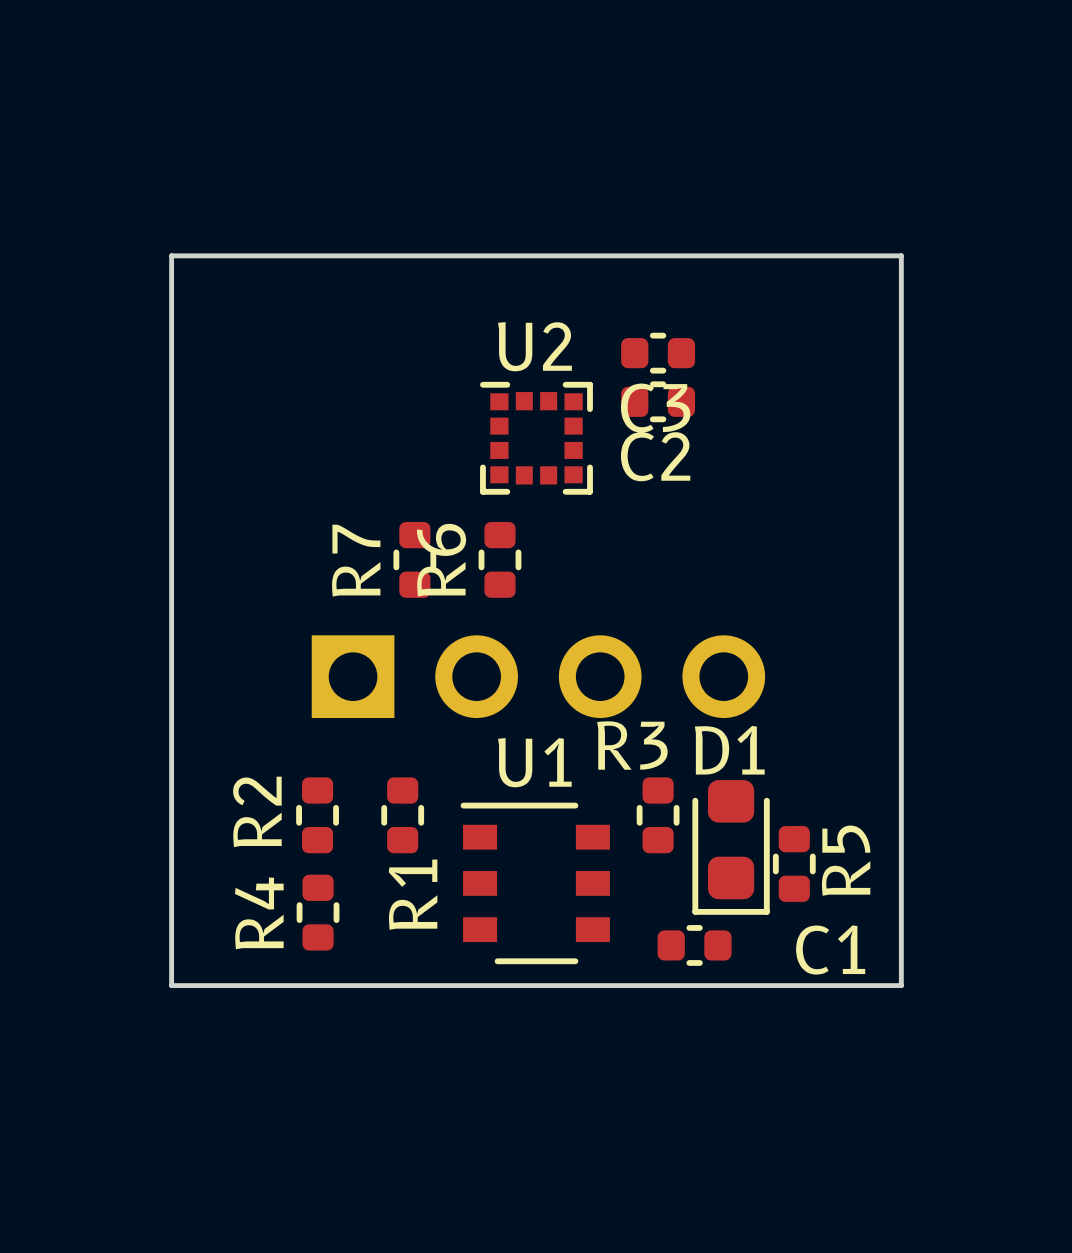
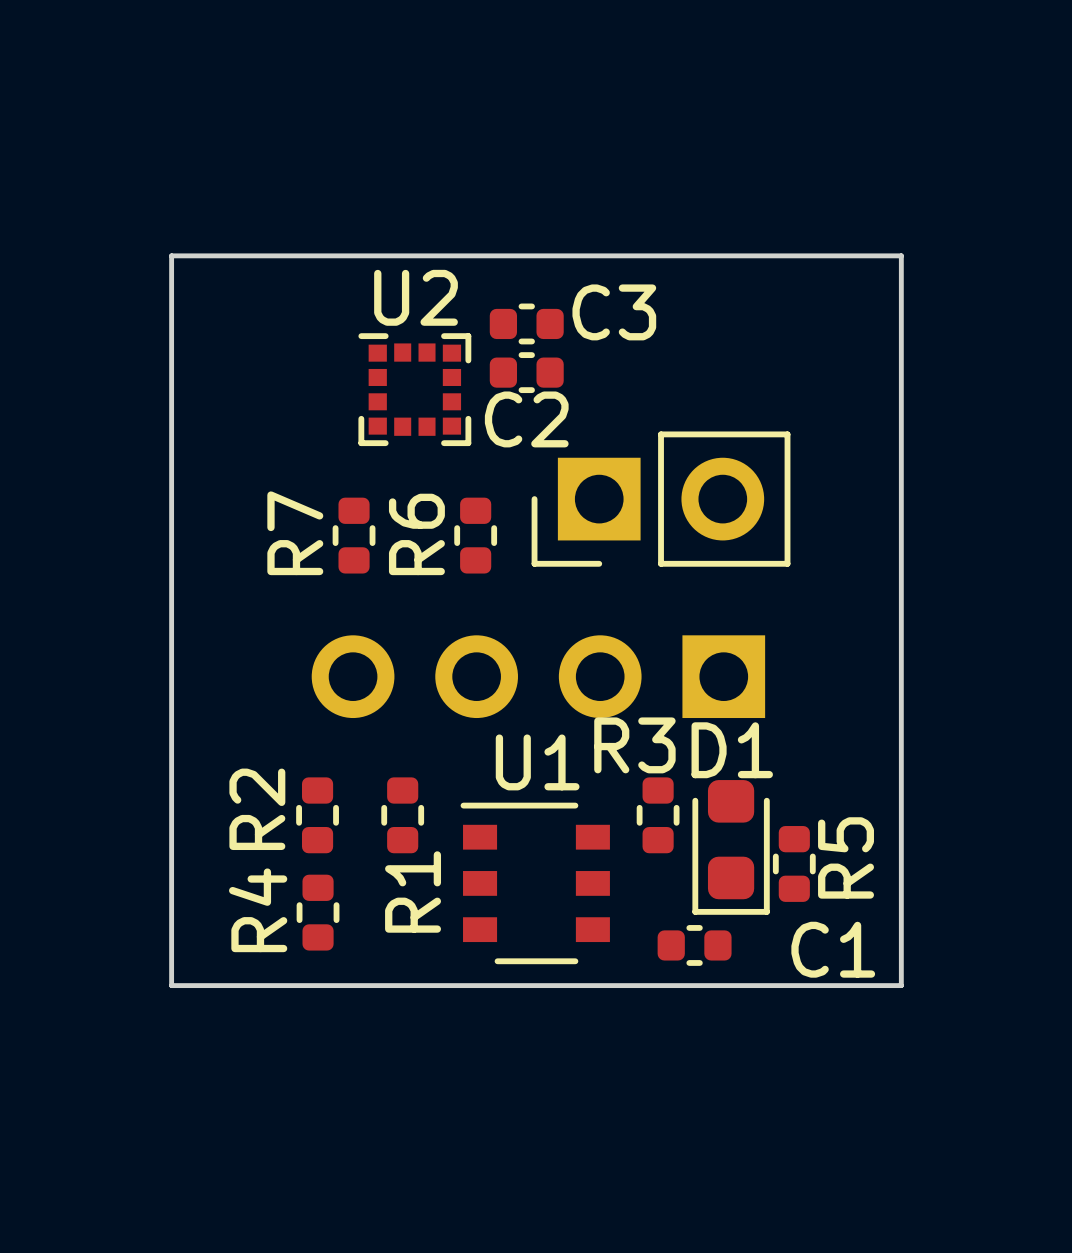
C3 position: (658, 353) -> (526, 323)
C2 position: (658, 401) -> (526, 372)
C3 name position: C3 (655, 408) -> C3 (614, 312)
U2 position: (536, 438) -> (414, 389)
C2 name position: C2 (655, 456) -> C2 (526, 419)
part: none -> (661, 499)
R7 position: (414, 559) -> (354, 535)
R6 position: (499, 559) -> (475, 535)
part rotation: 0° (538, 676) -> 180° (538, 676)

